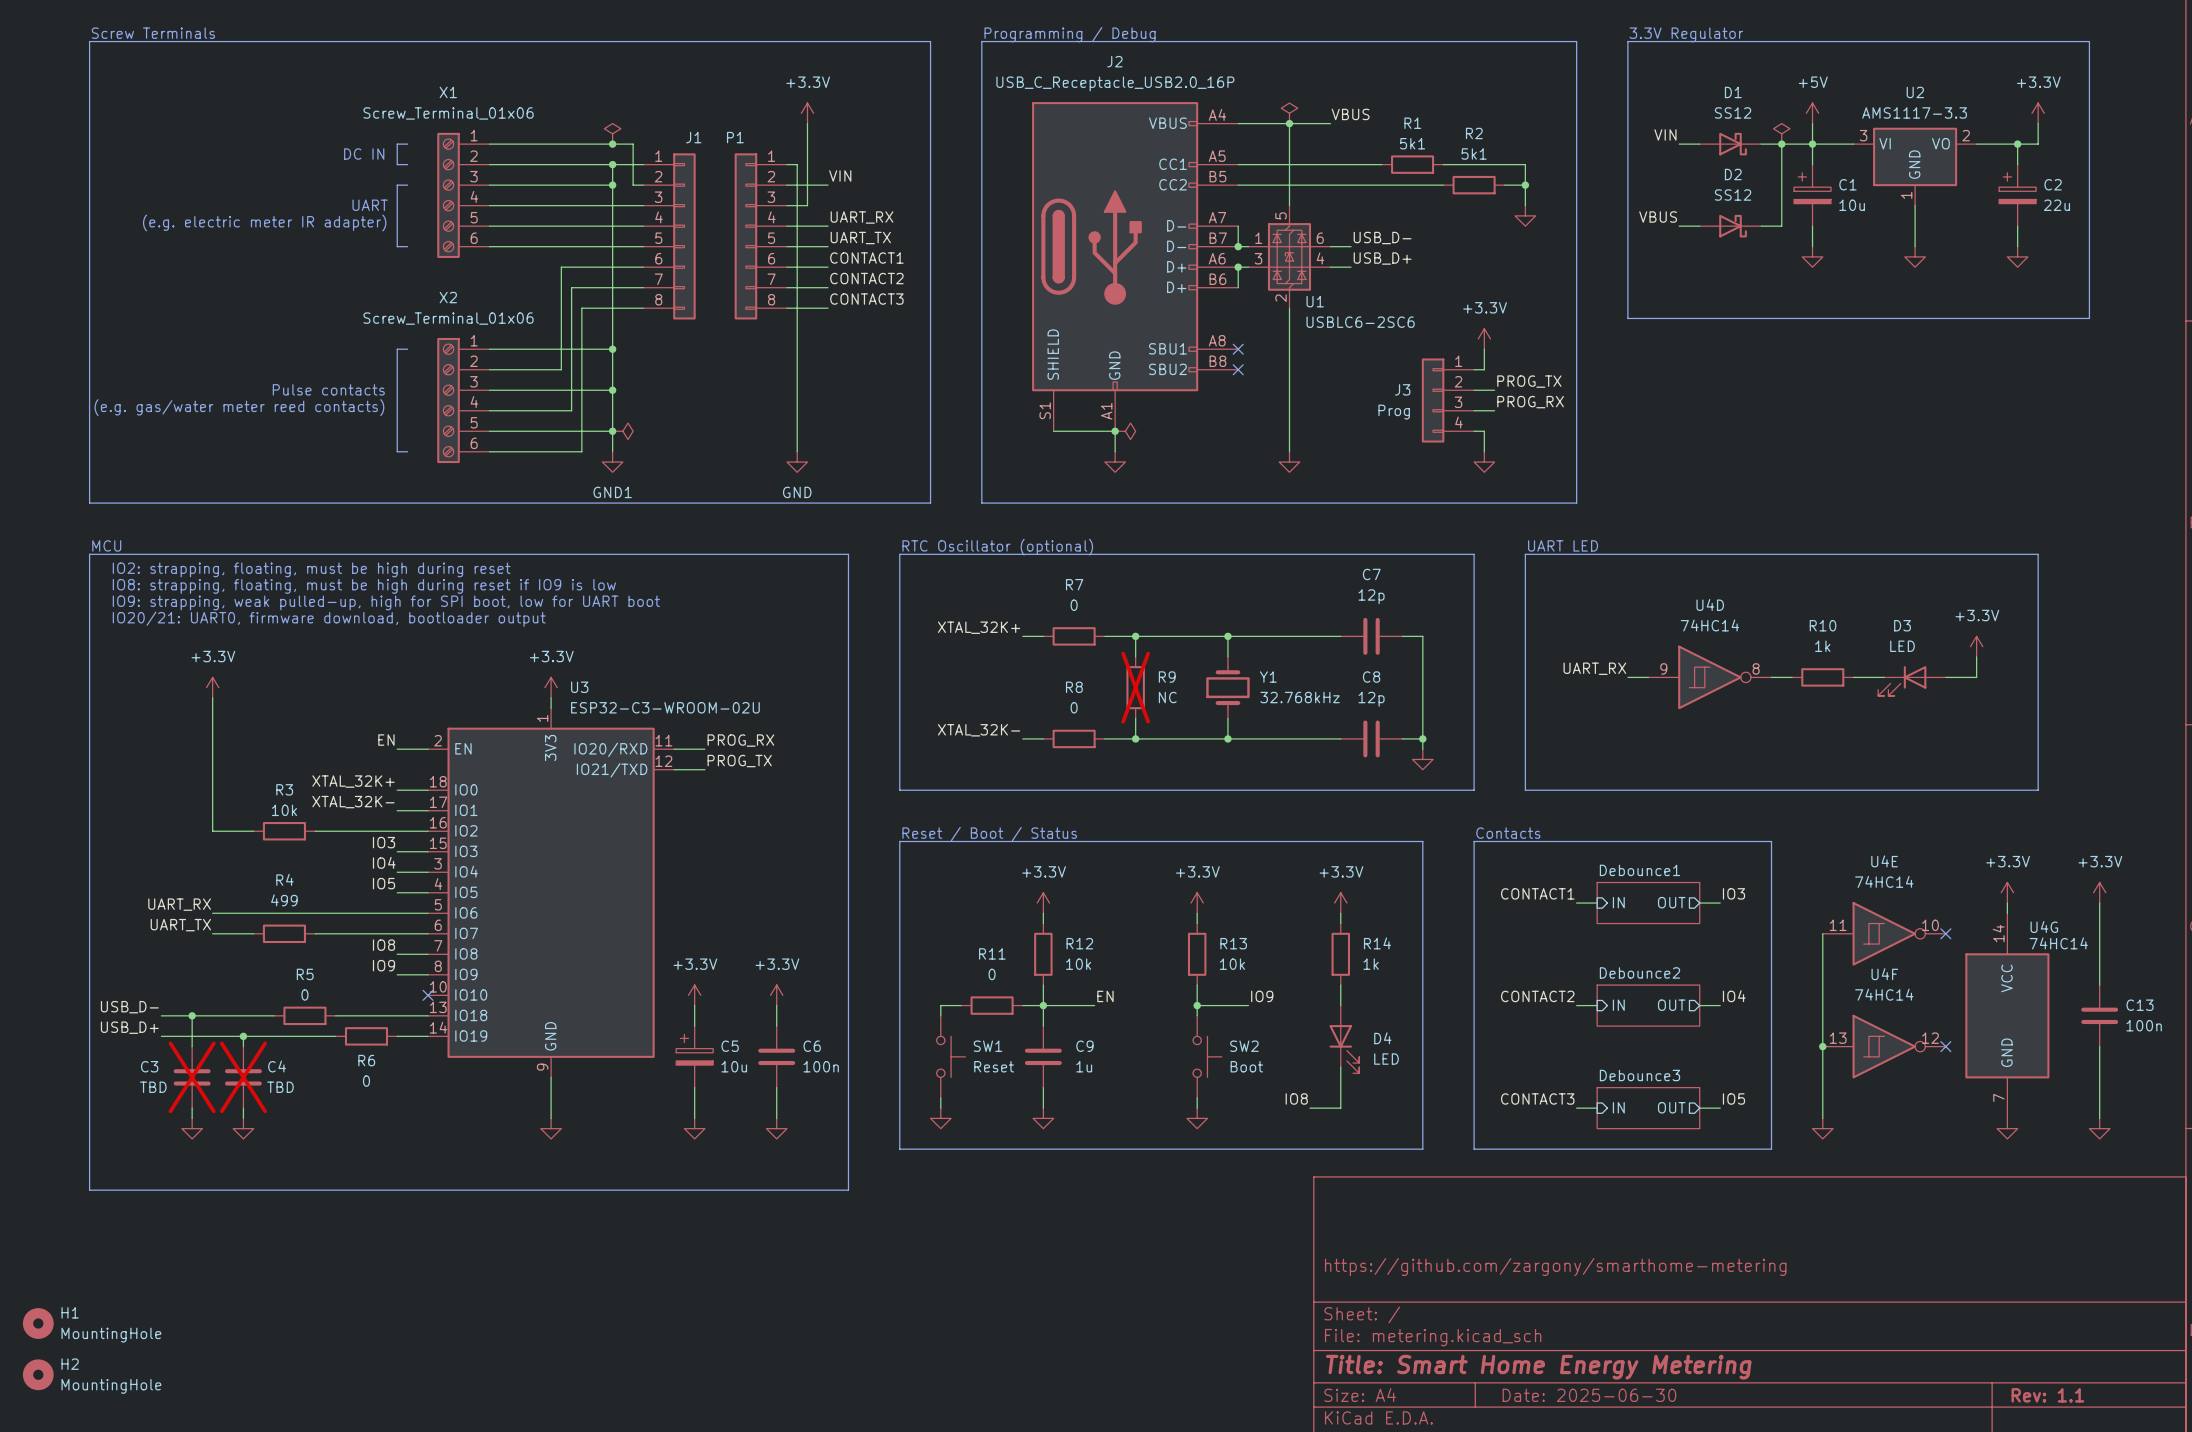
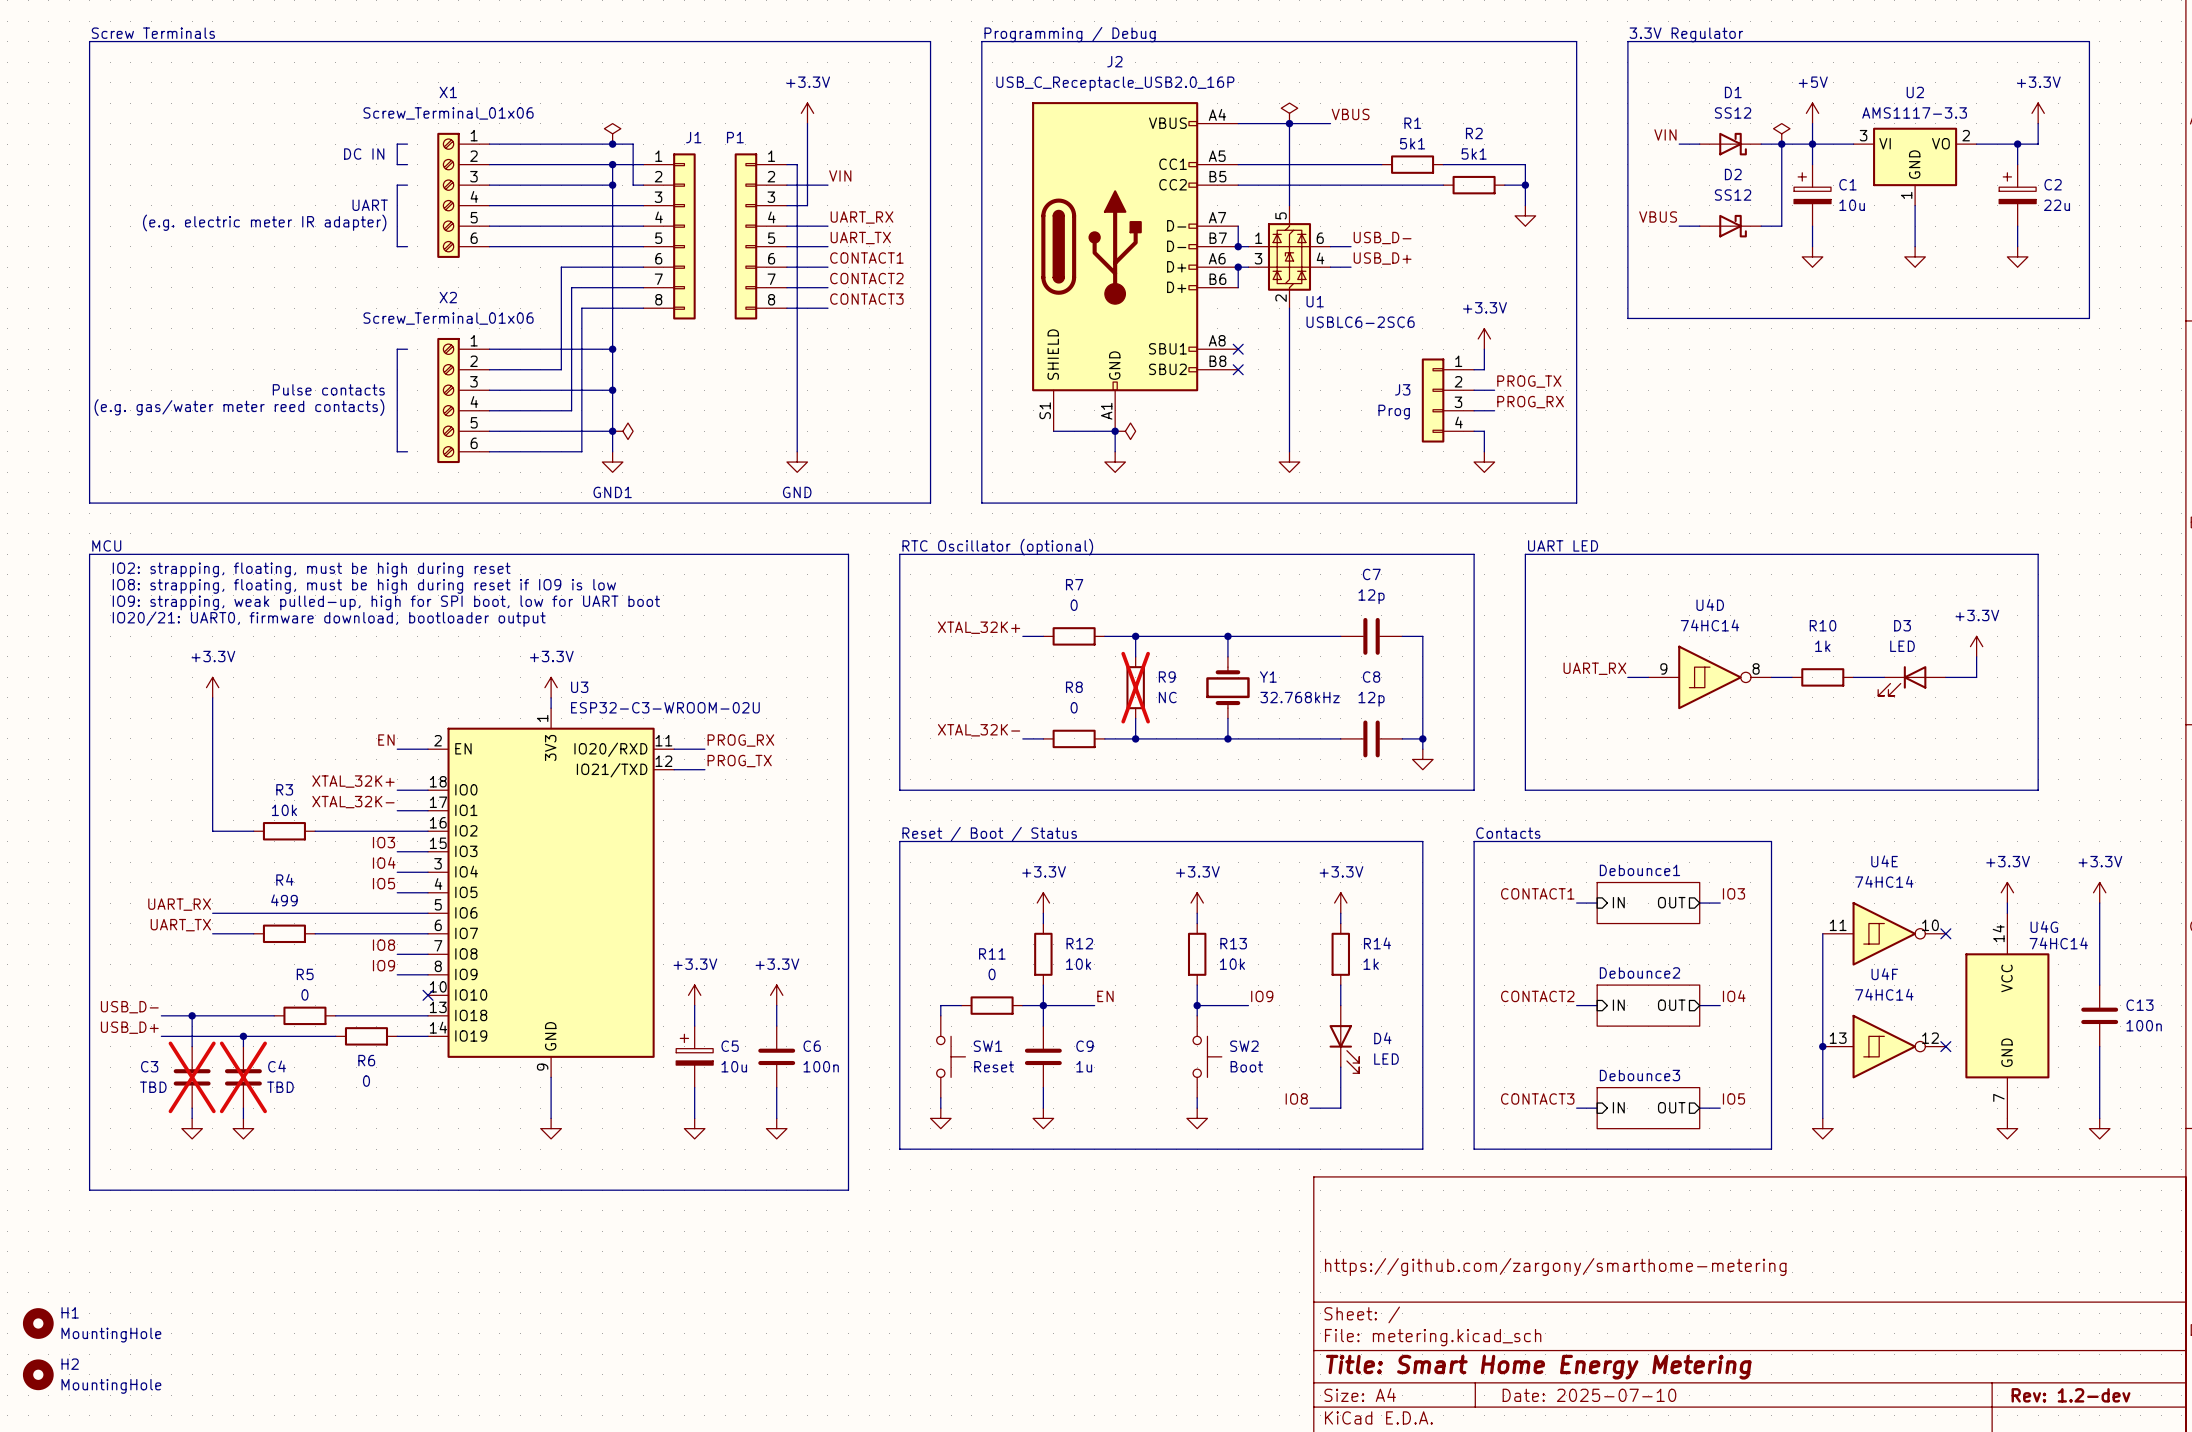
title block: Date: 2025-06-30 (1589, 1395) -> Date: 2025-07-10 (1589, 1395)
title block: Rev: 1.1 (2047, 1395) -> Rev: 1.2-dev (2071, 1395)

